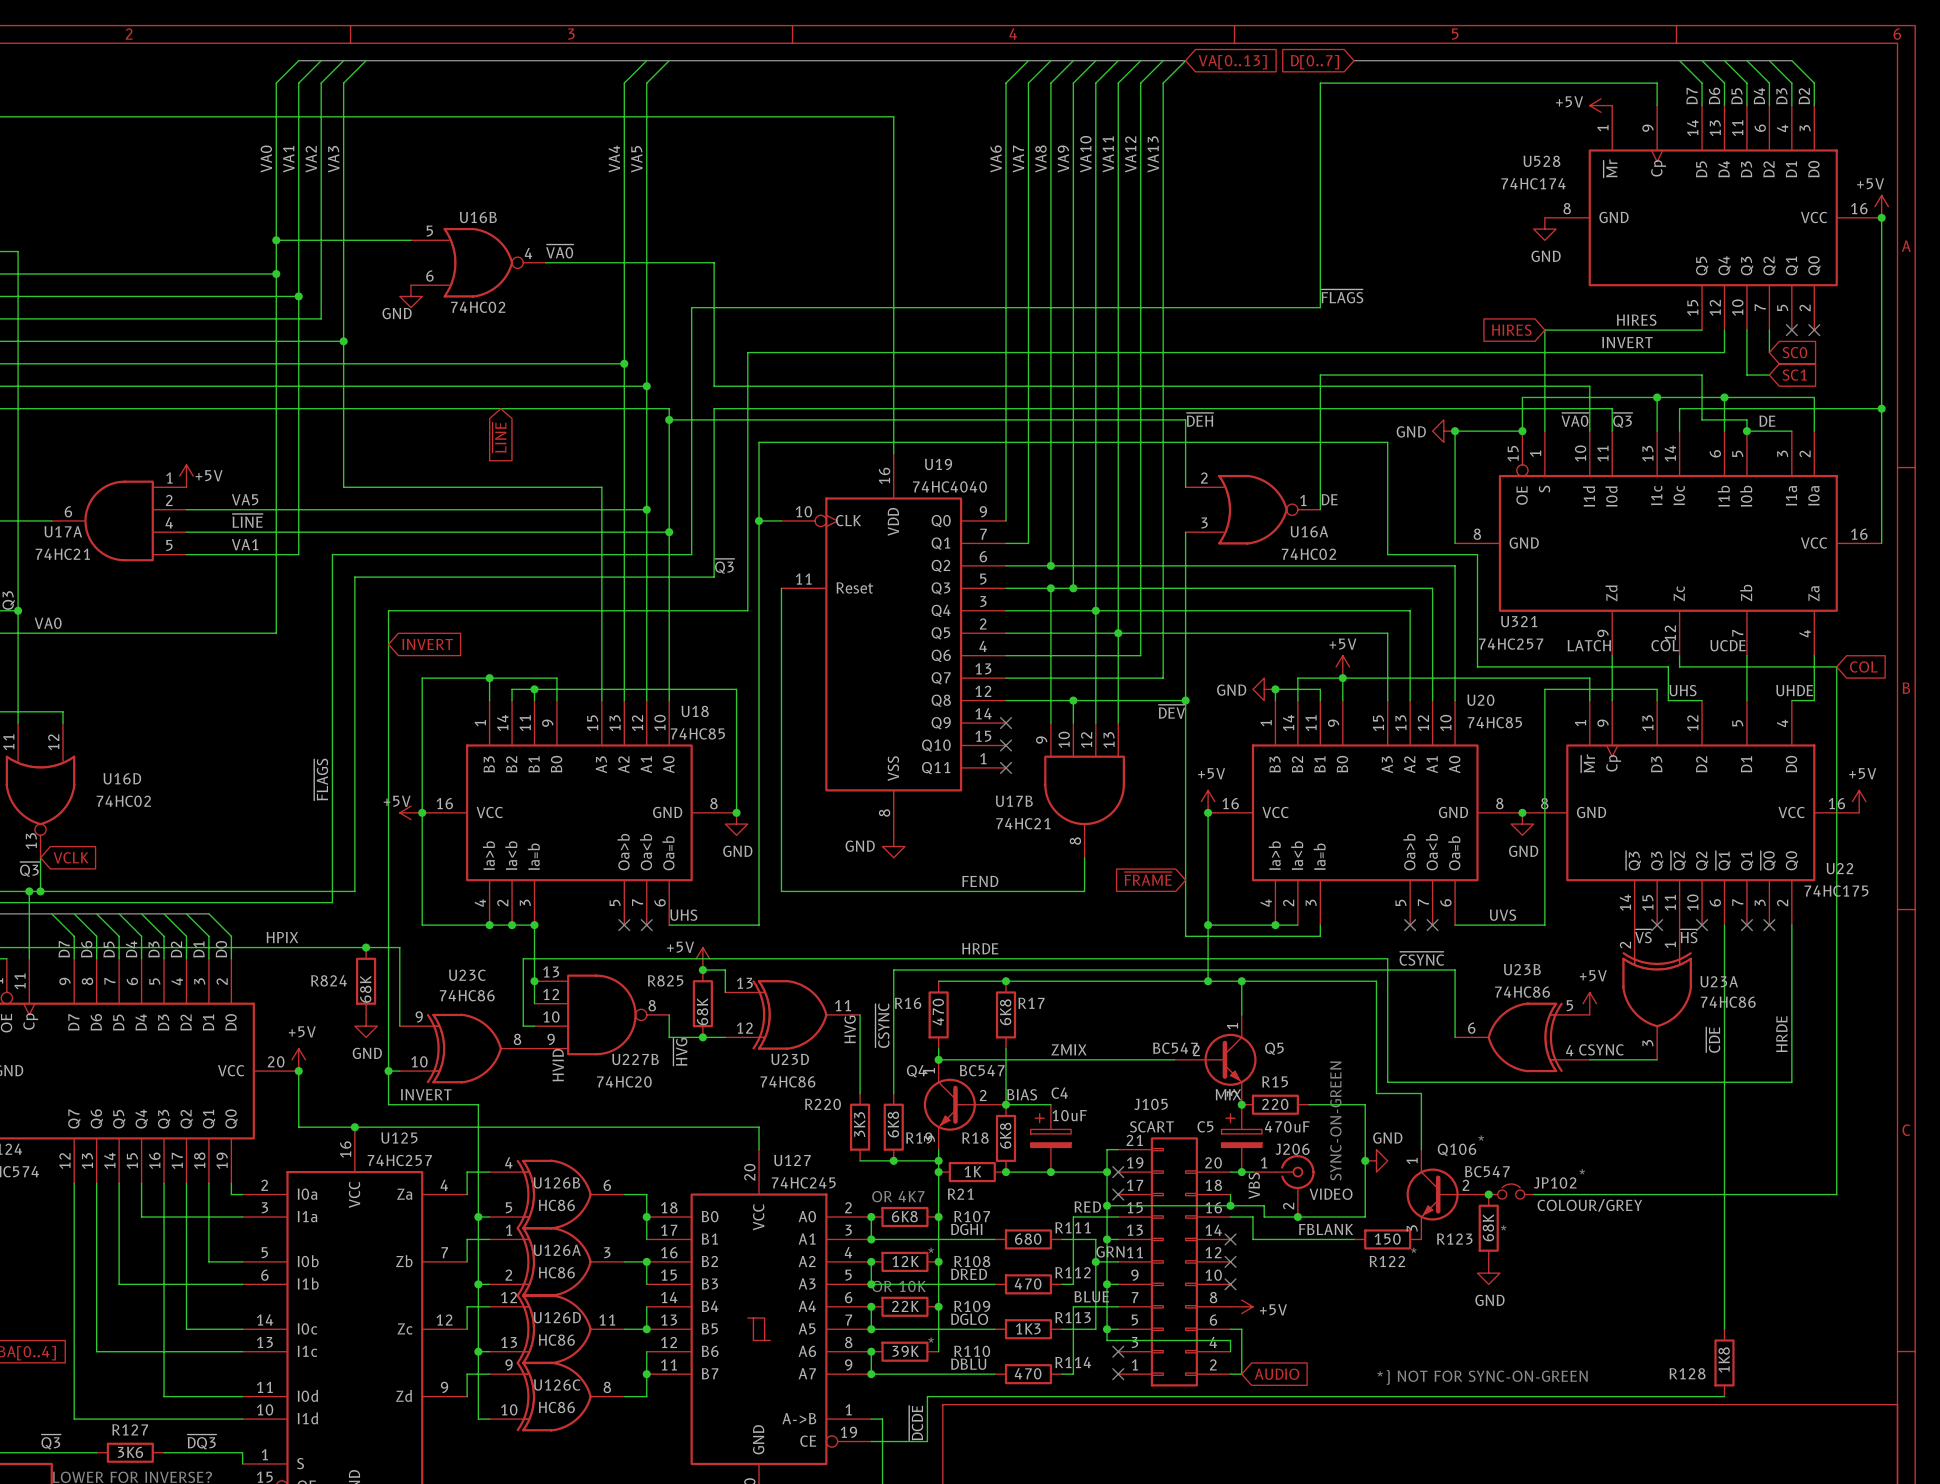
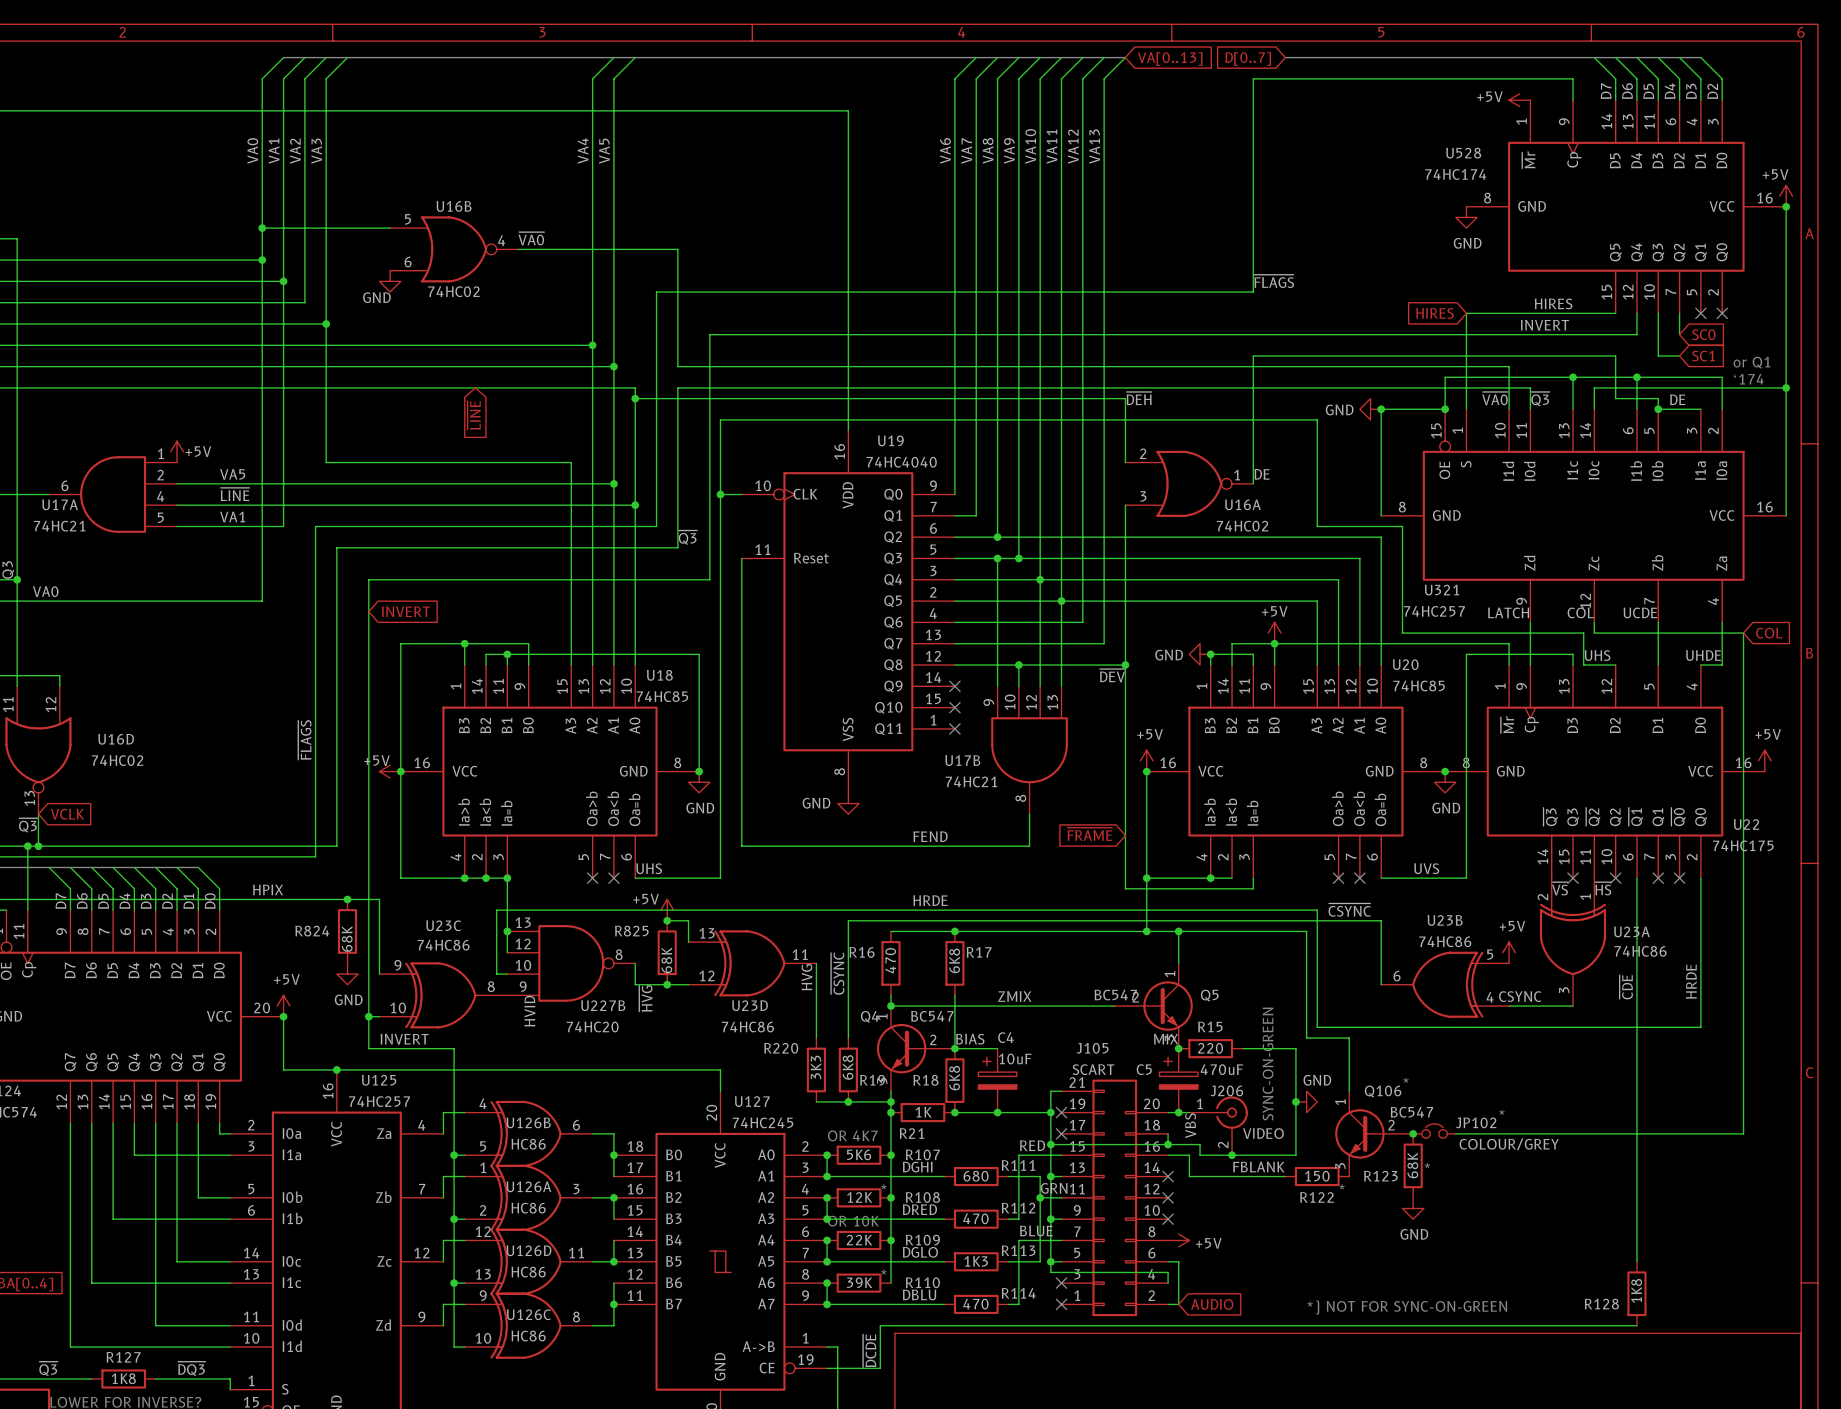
text: none -> or Q1 (1751, 362)
text: none -> ‘174 (1748, 379)
R107 value: 6K8 (904, 1216) -> 5K6 (859, 1154)
R127 value: 3K6 (130, 1452) -> 1K8 (123, 1378)

